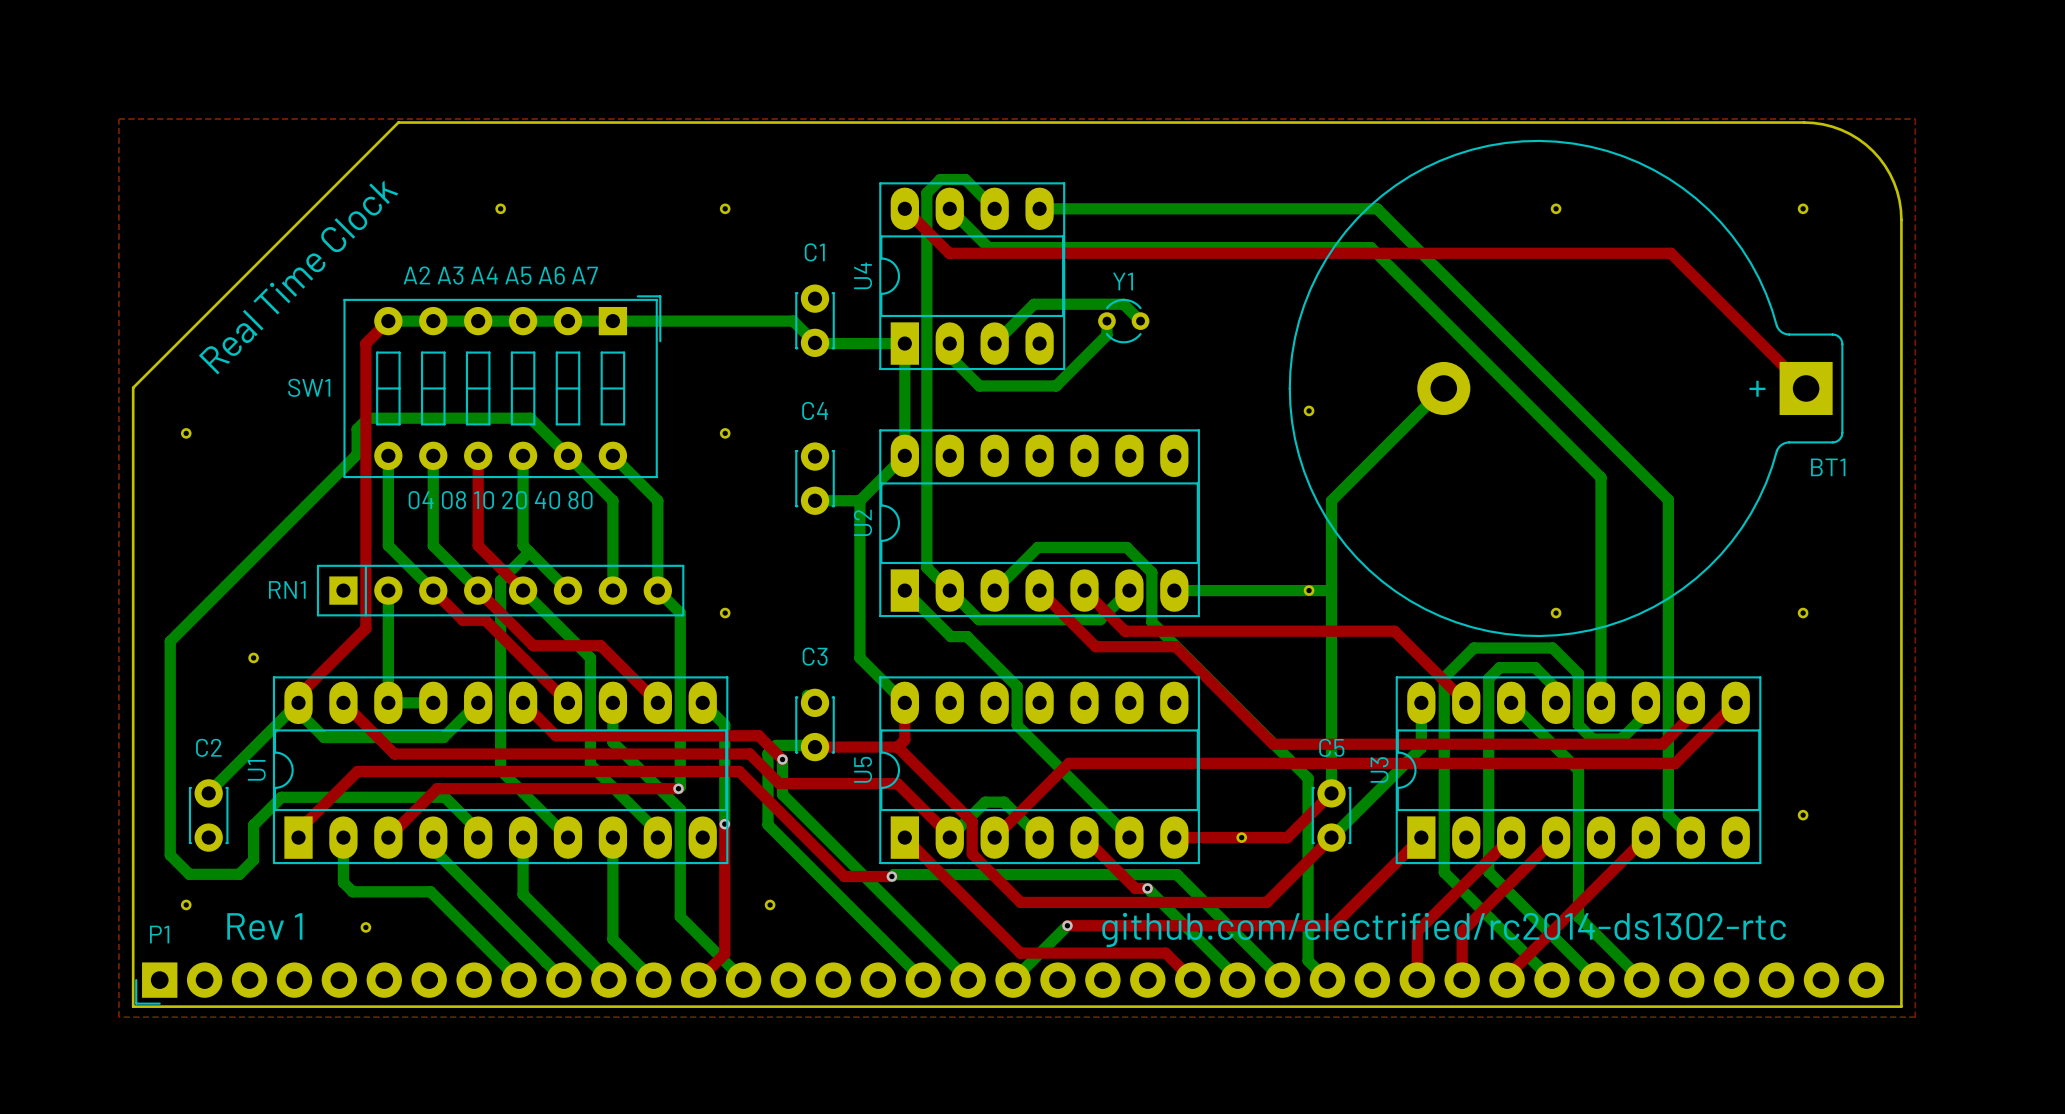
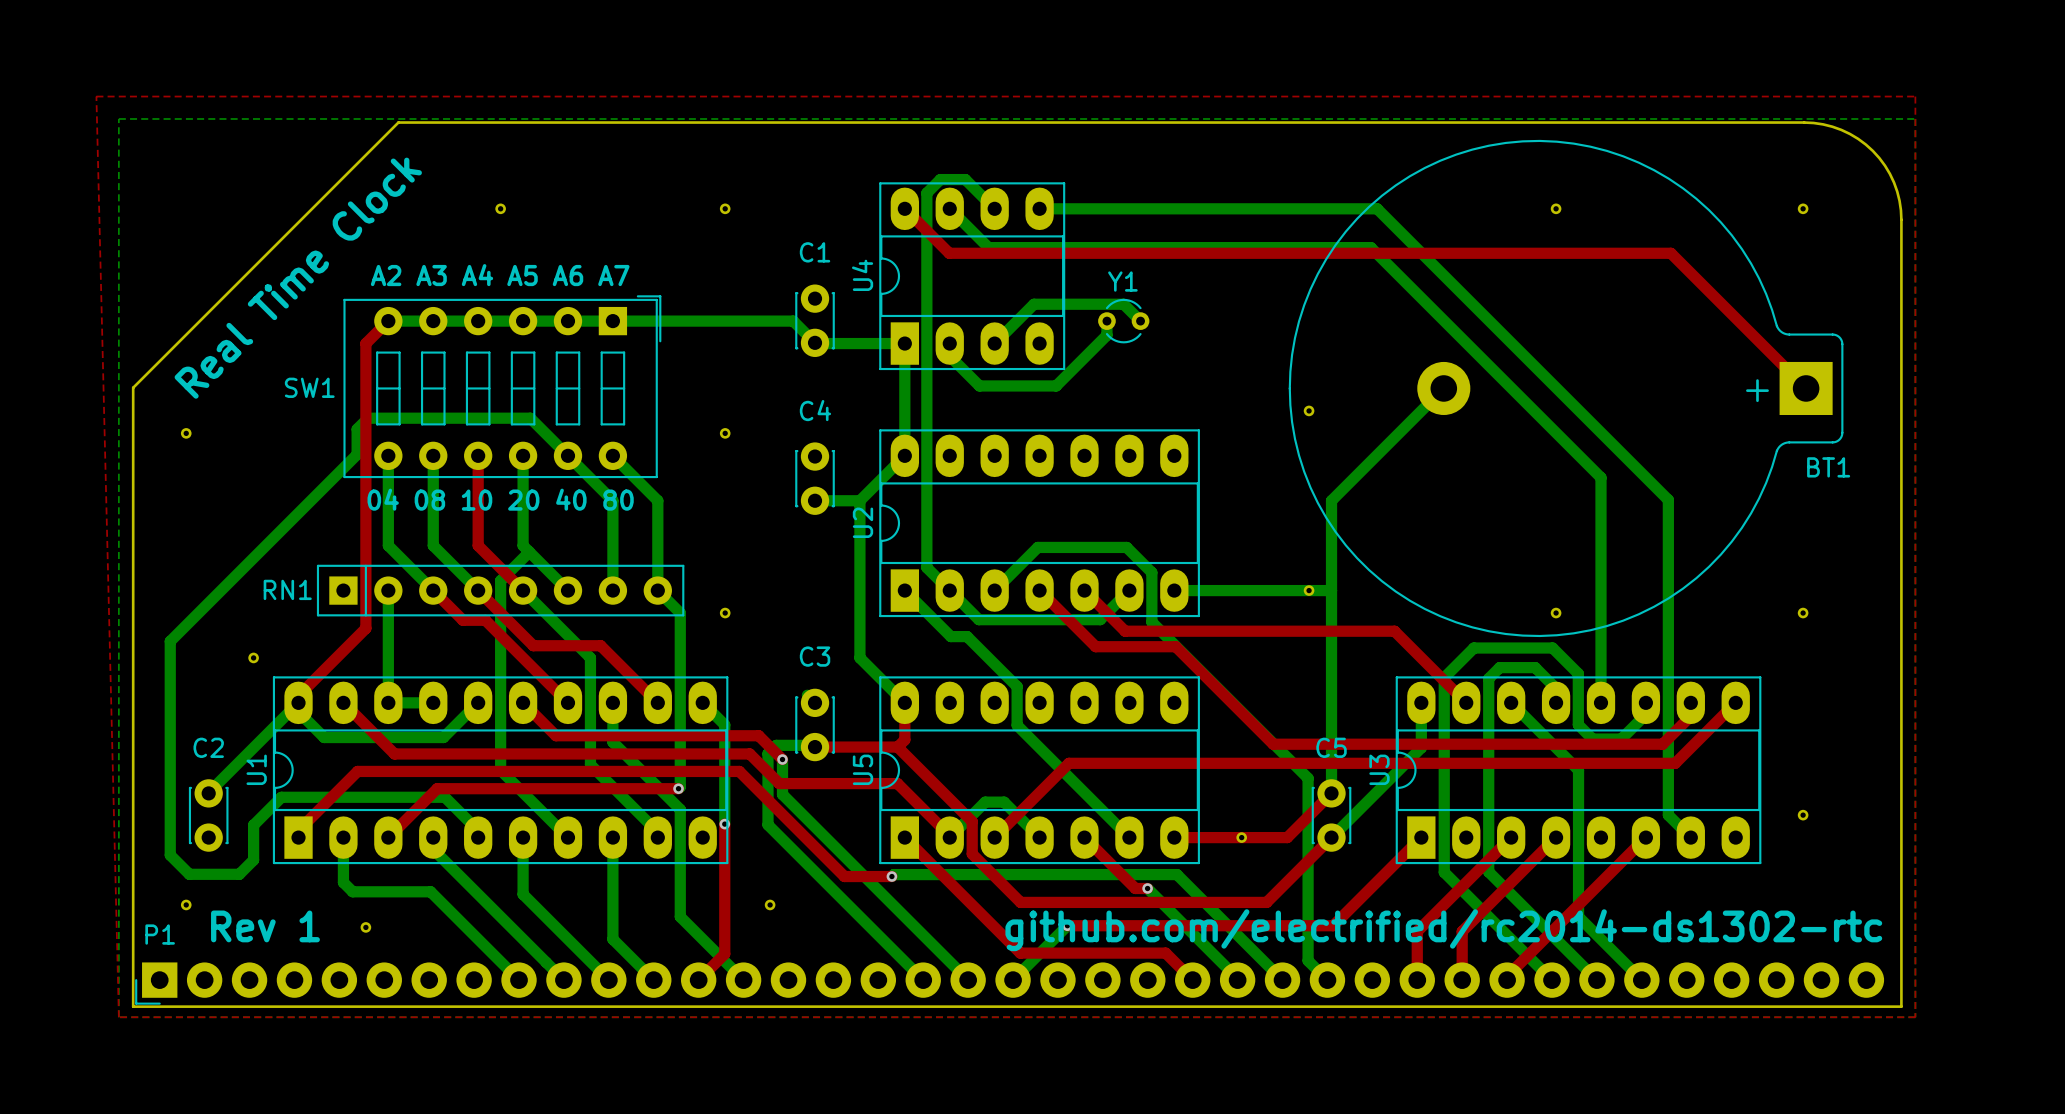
top zone outline: (1915, 118) (118, 118) (118, 1017) -> (1915, 118) (1915, 96) (96, 96) (118, 1017)

